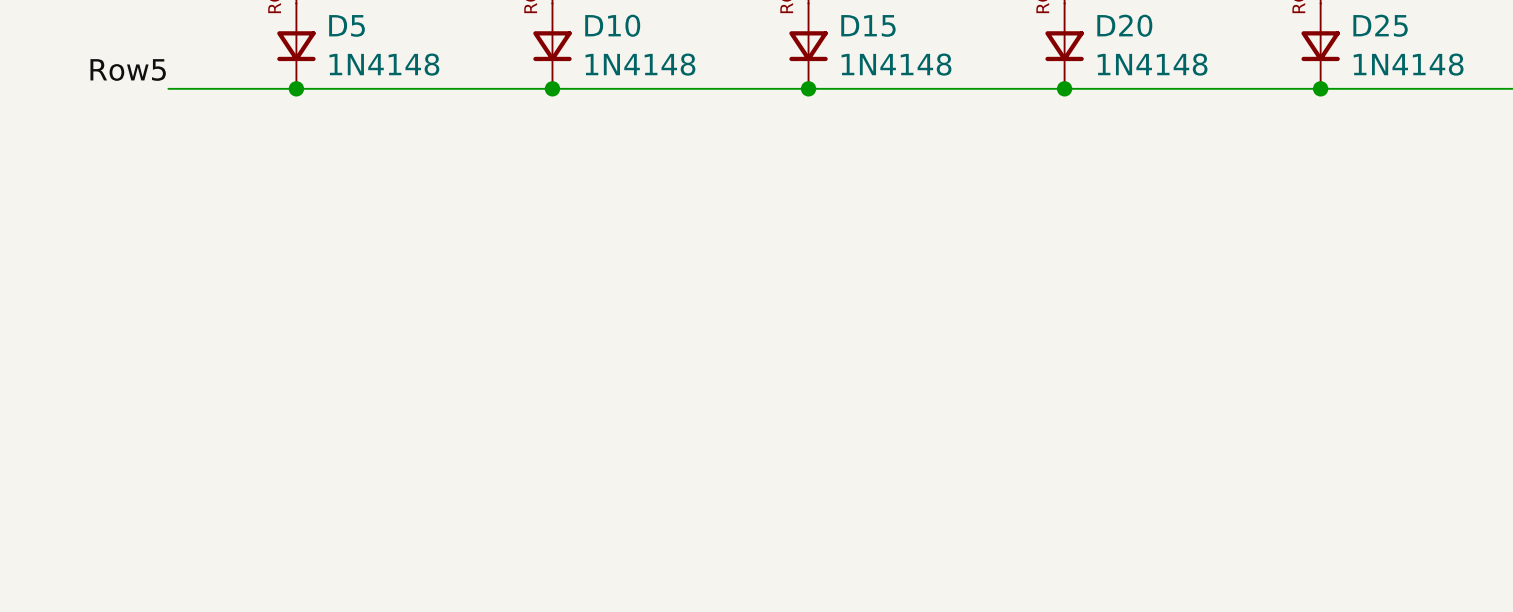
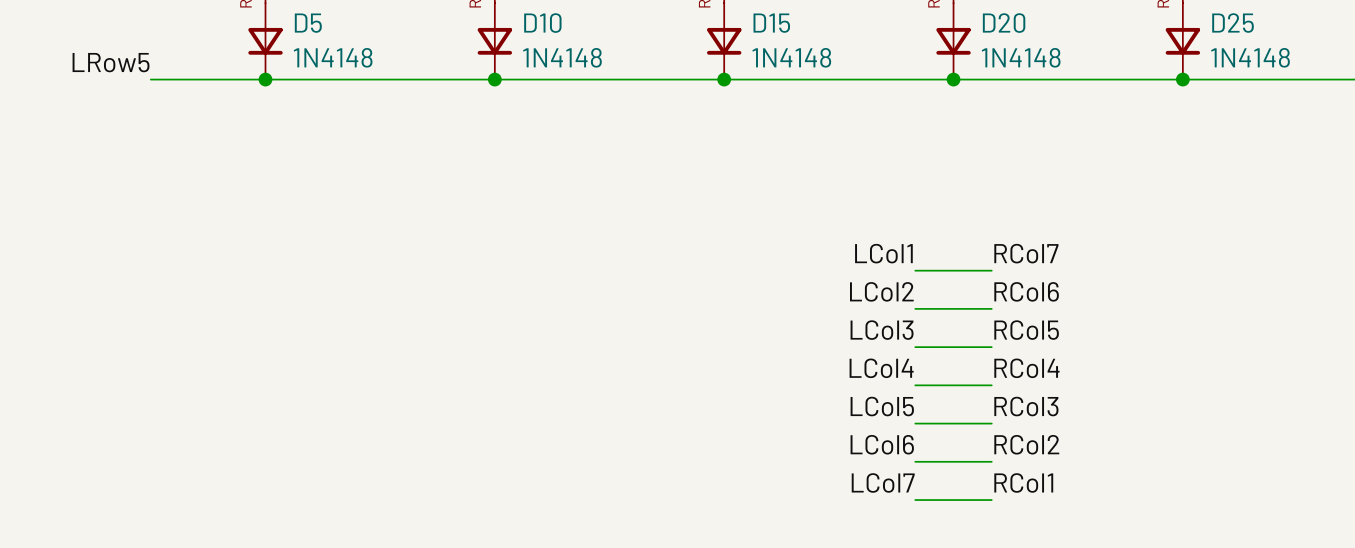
label: Row5 (128, 69) -> LRow5 (111, 62)
label: none -> LCol1 (883, 253)
label: none -> RCol7 (1026, 253)
wire: none -> (915, 270) (991, 270)
label: none -> LCol2 (881, 291)
label: none -> RCol6 (1026, 291)
wire: none -> (915, 308) (991, 308)
label: none -> LCol3 (882, 330)
label: none -> RCol5 (1026, 330)
wire: none -> (915, 347) (991, 347)
label: none -> LCol4 (881, 368)
label: none -> RCol4 (1026, 368)
wire: none -> (915, 385) (991, 385)
label: none -> LCol5 (882, 406)
label: none -> RCol3 (1026, 406)
wire: none -> (915, 423) (991, 423)
label: none -> LCol6 (882, 444)
label: none -> RCol2 (1026, 444)
wire: none -> (915, 461) (991, 461)
label: none -> LCol7 (883, 482)
label: none -> RCol1 (1023, 482)
wire: none -> (915, 500) (991, 500)

